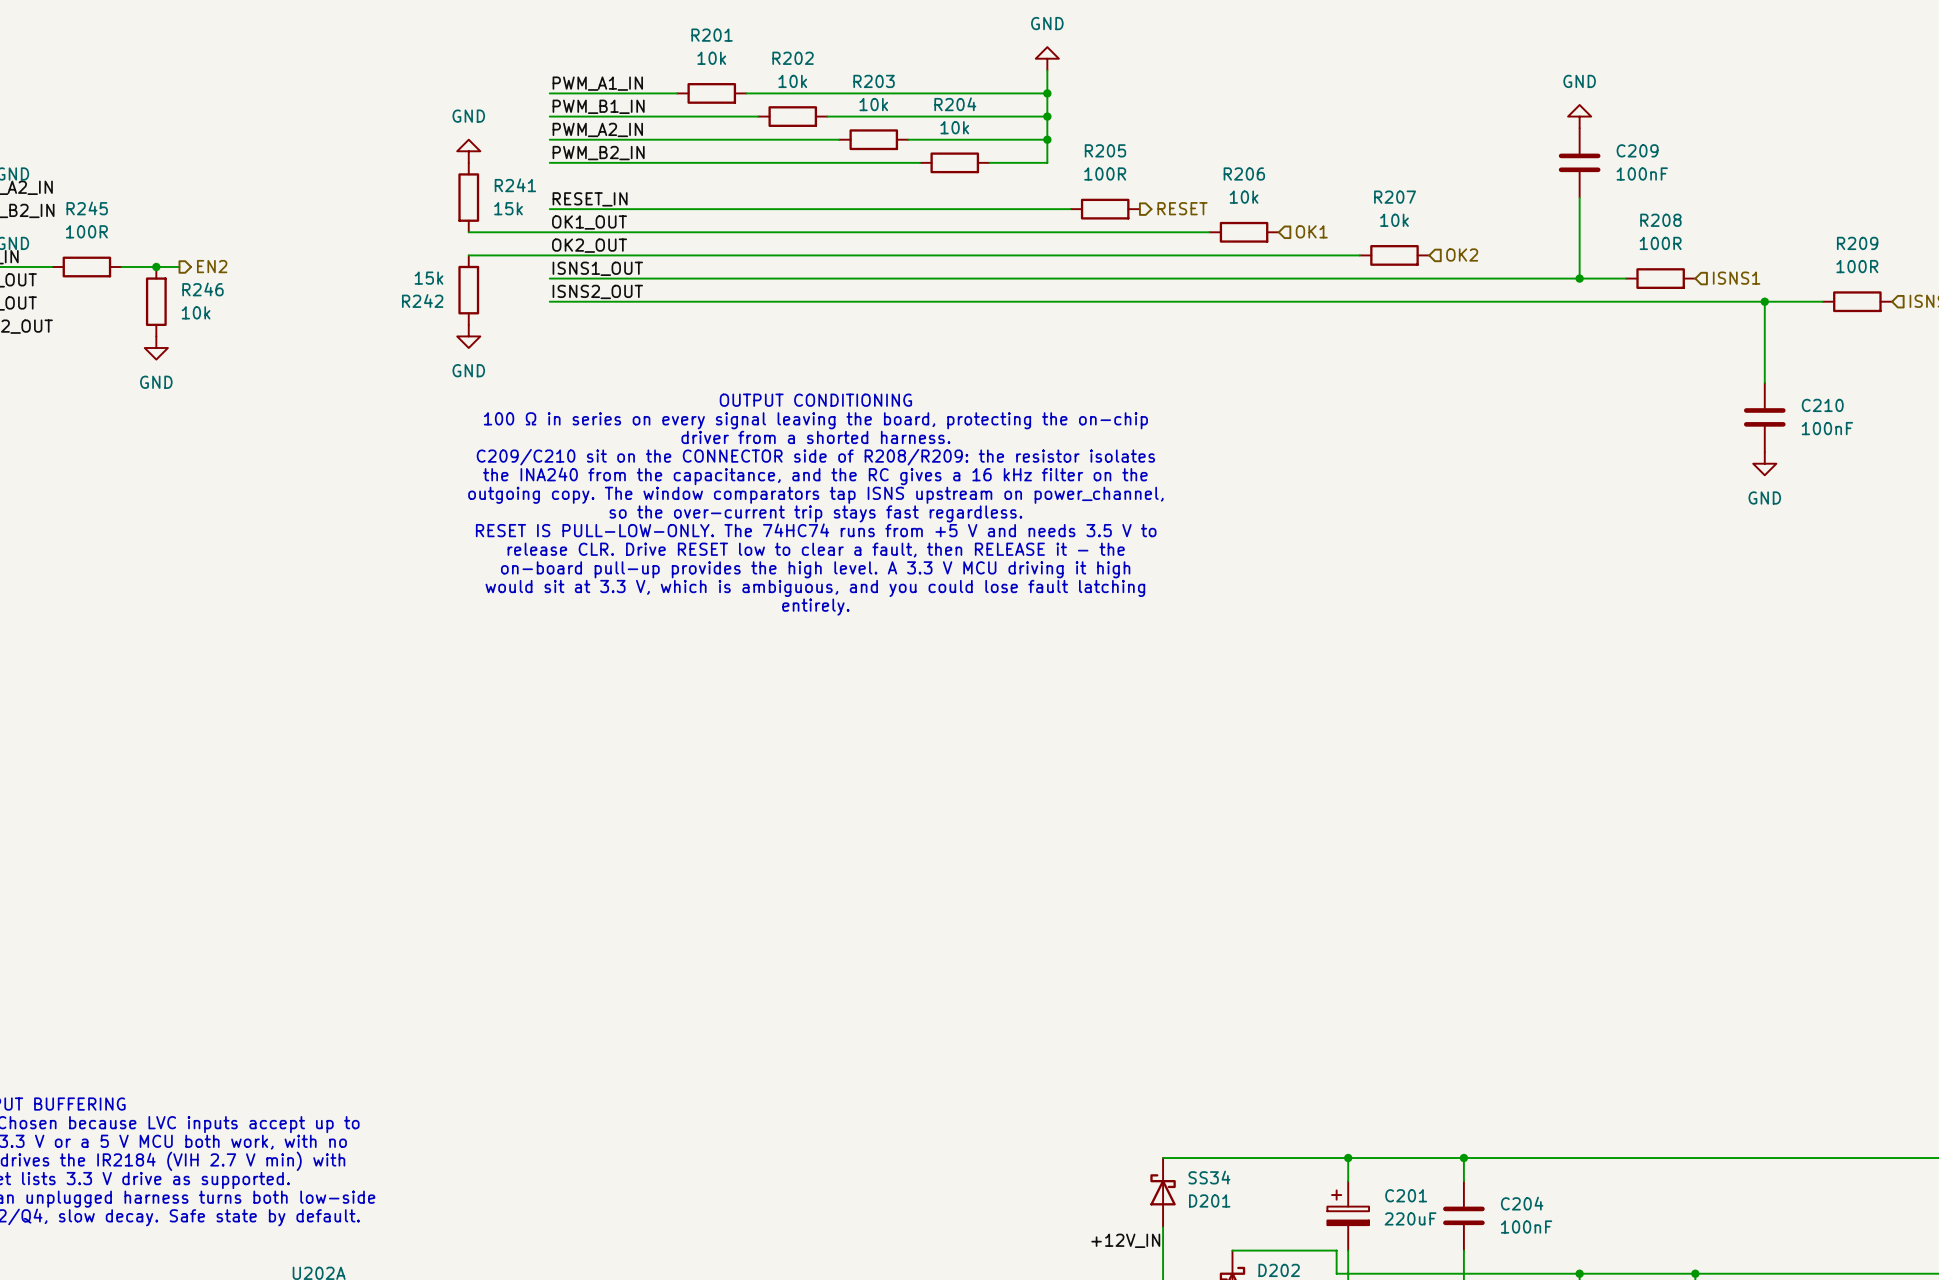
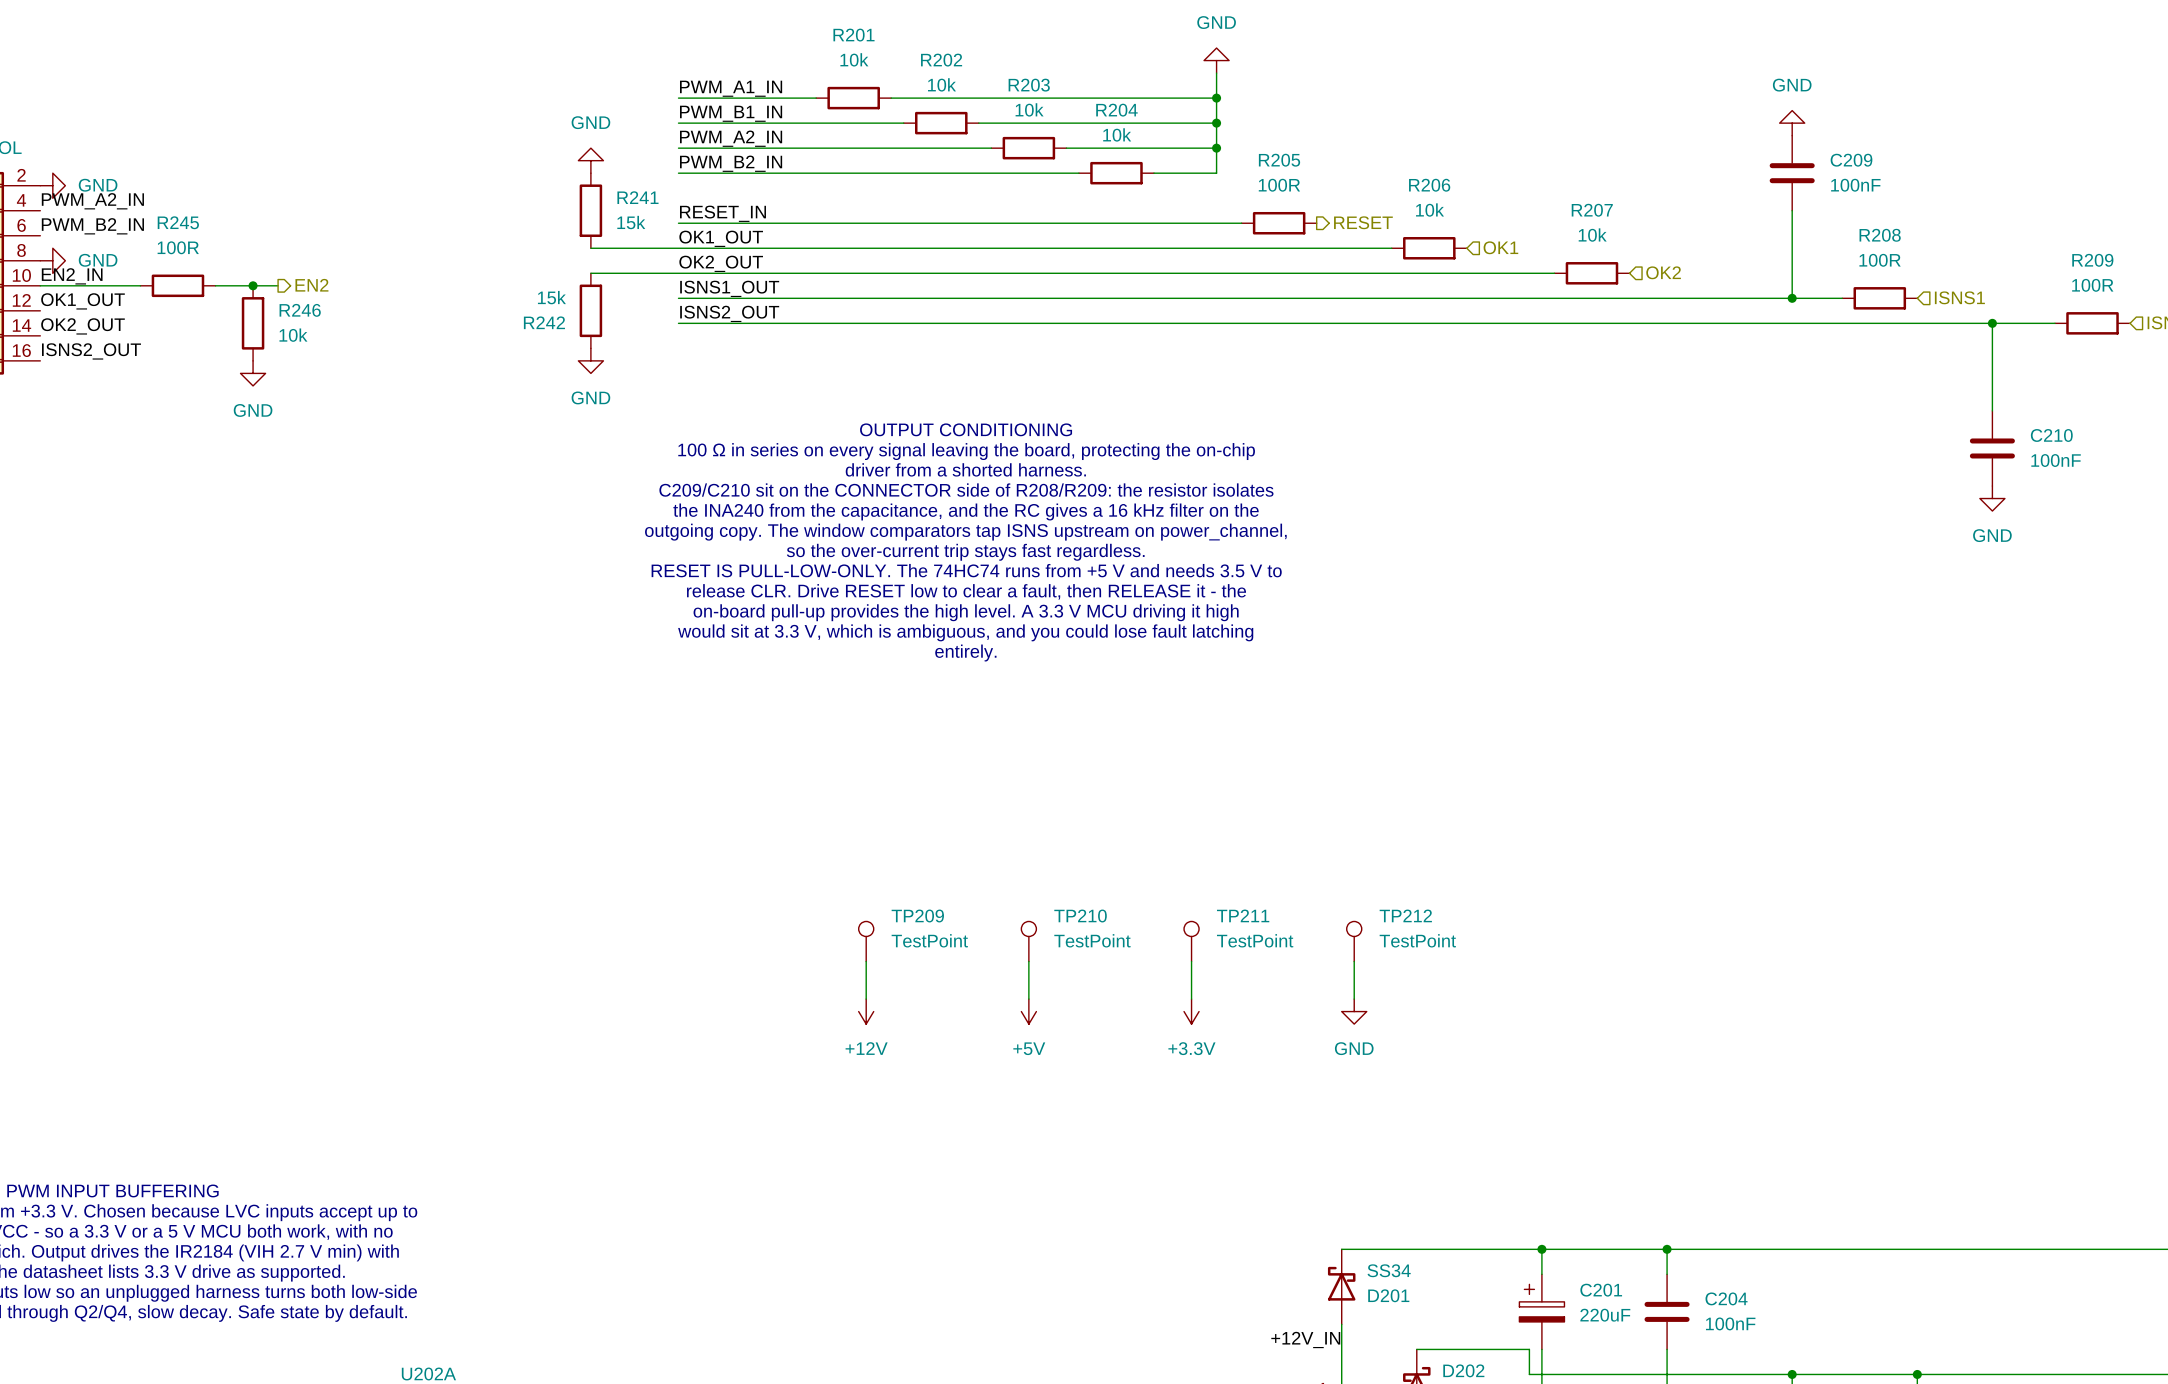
TP209: none -> TestPoint (866, 941)
TP210: none -> TestPoint (1028, 941)
TP211: none -> TestPoint (1191, 941)
TP212: none -> TestPoint (1354, 941)
wire: none -> (866, 961) (866, 999)
wire: none -> (1028, 961) (1028, 999)
wire: none -> (1191, 961) (1191, 999)
wire: none -> (1354, 961) (1354, 999)
power symbol: none -> +12V (866, 1011)
power symbol: none -> +5V (1028, 1011)
power symbol: none -> +3.3V (1191, 1011)
power symbol: none -> GND (1354, 1011)

